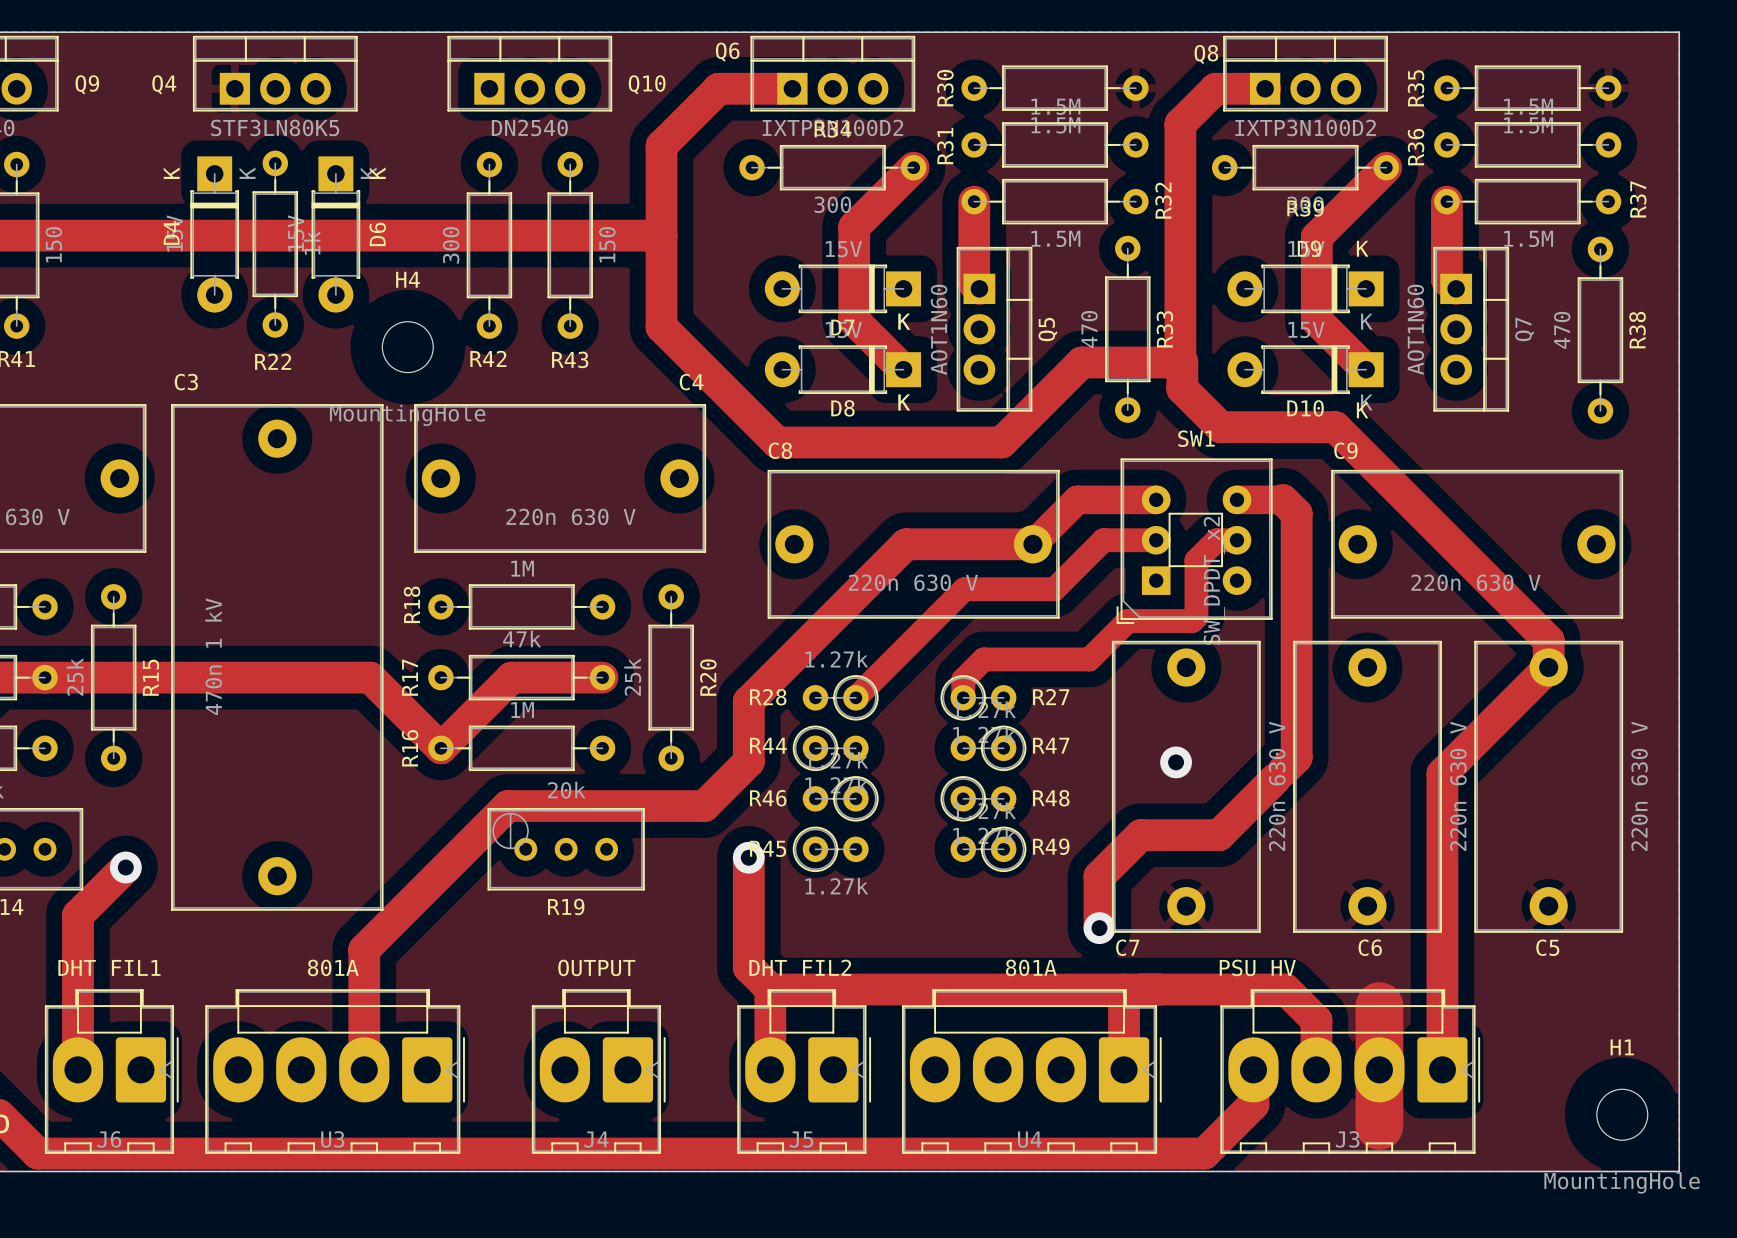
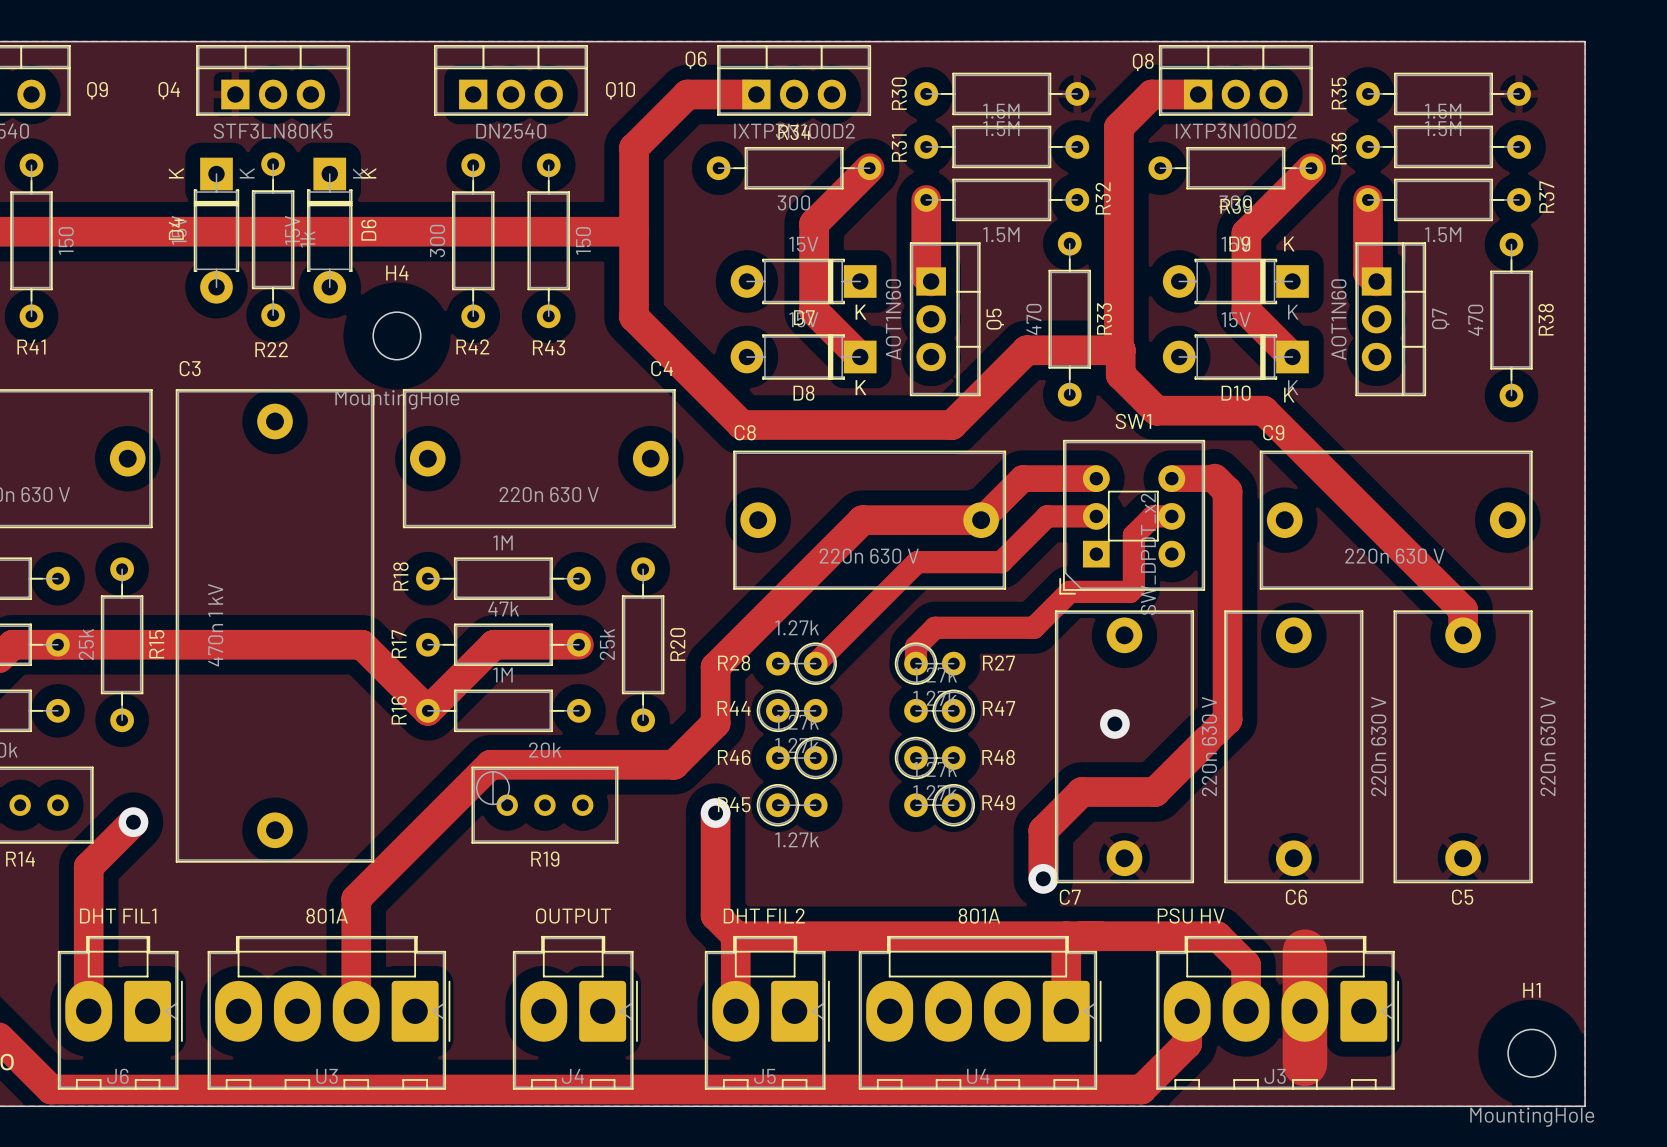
track: (1548, 667) (1442, 773) (1442, 1069) -> none

